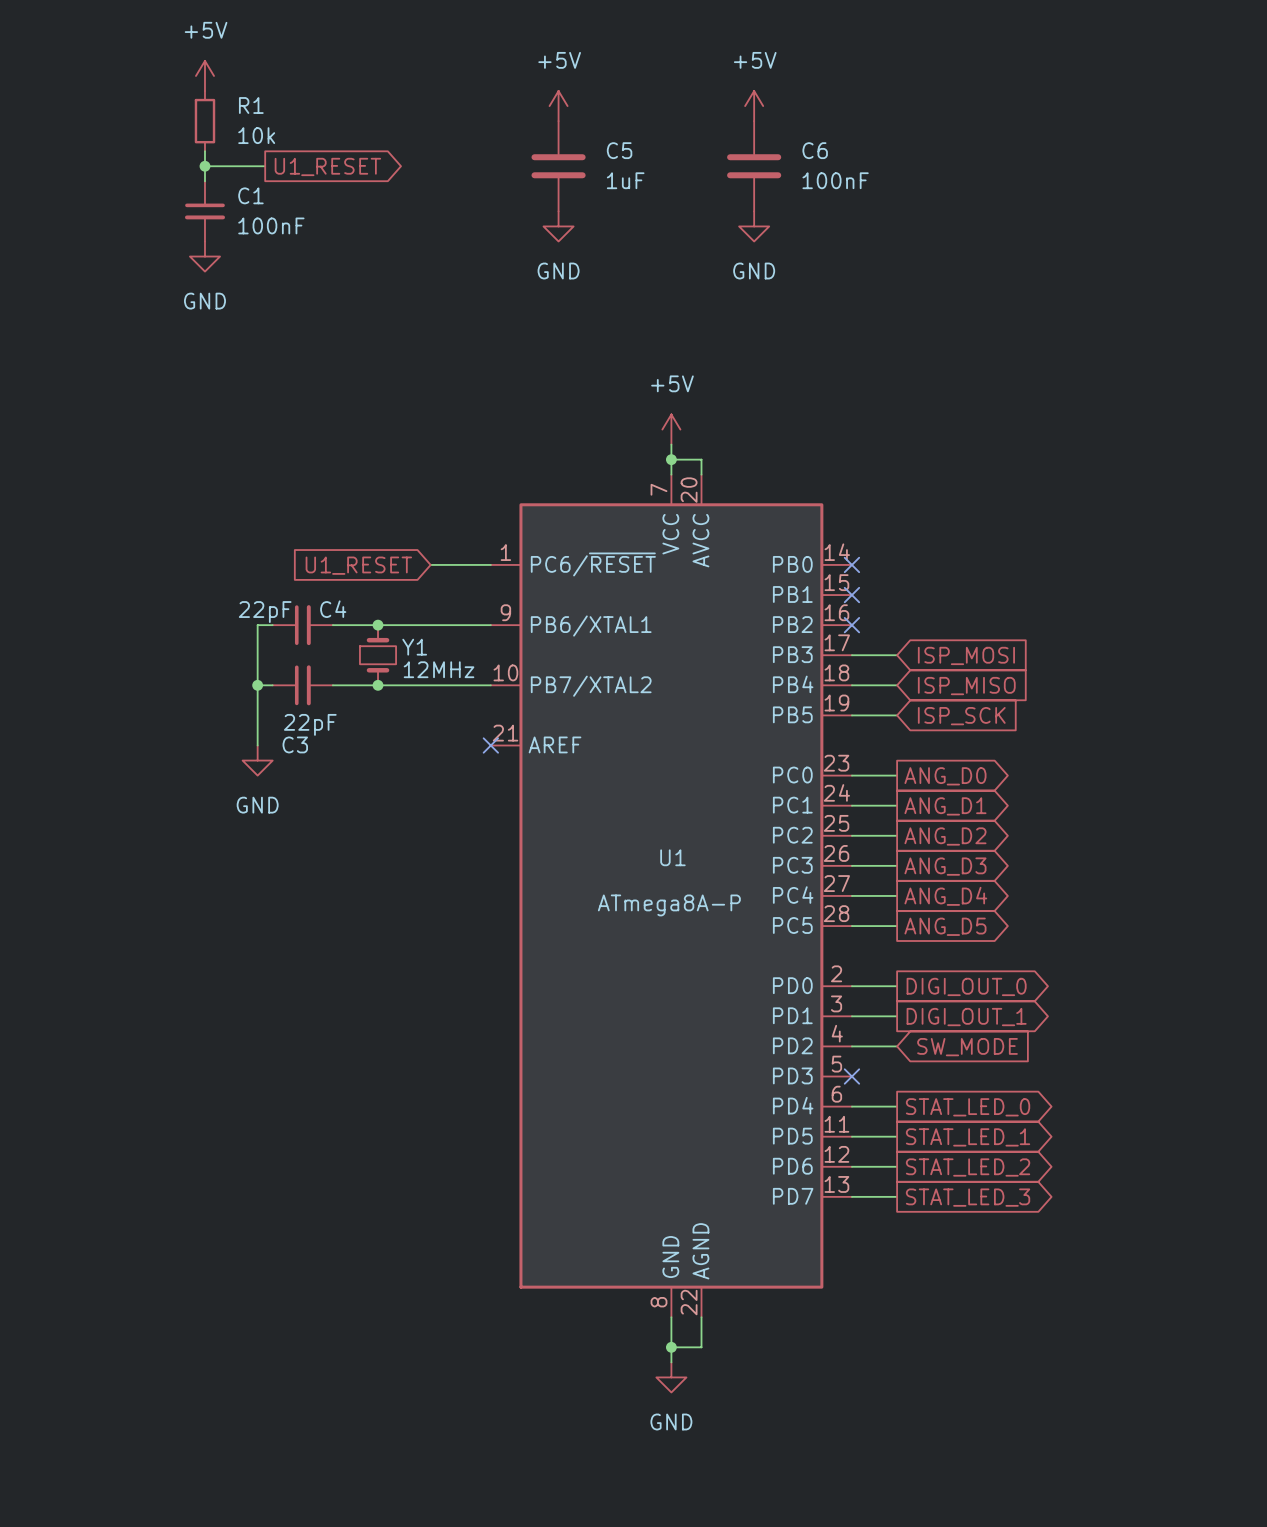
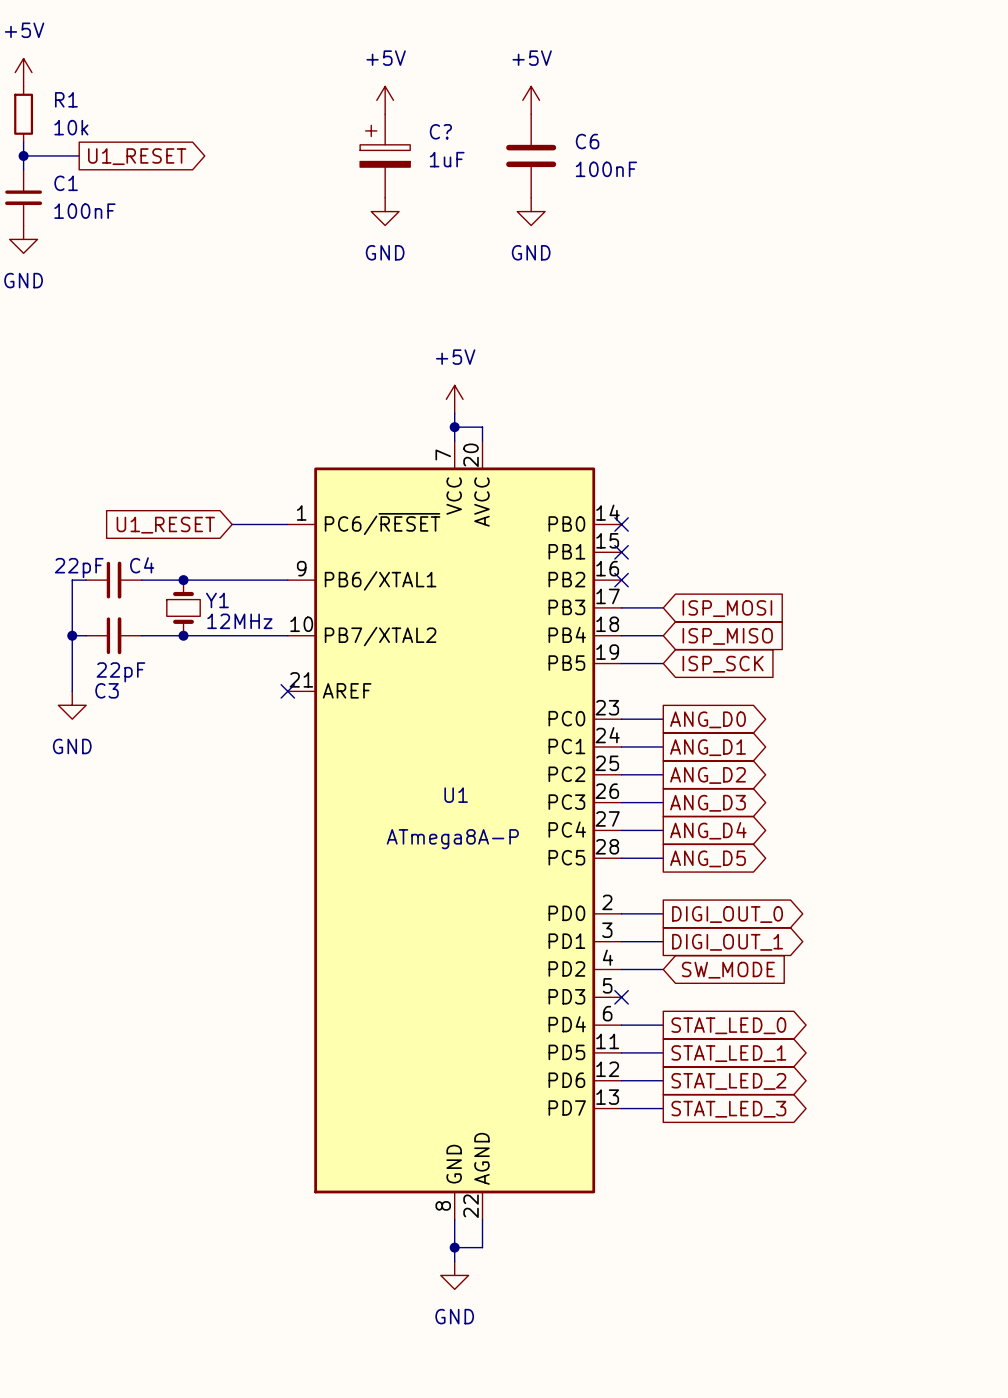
power symbol position: +5V (558, 106) -> +5V (385, 100)
C5: 1uF (558, 166) -> none
C?: none -> 1uF (385, 155)
power symbol position: GND (558, 226) -> GND (385, 211)

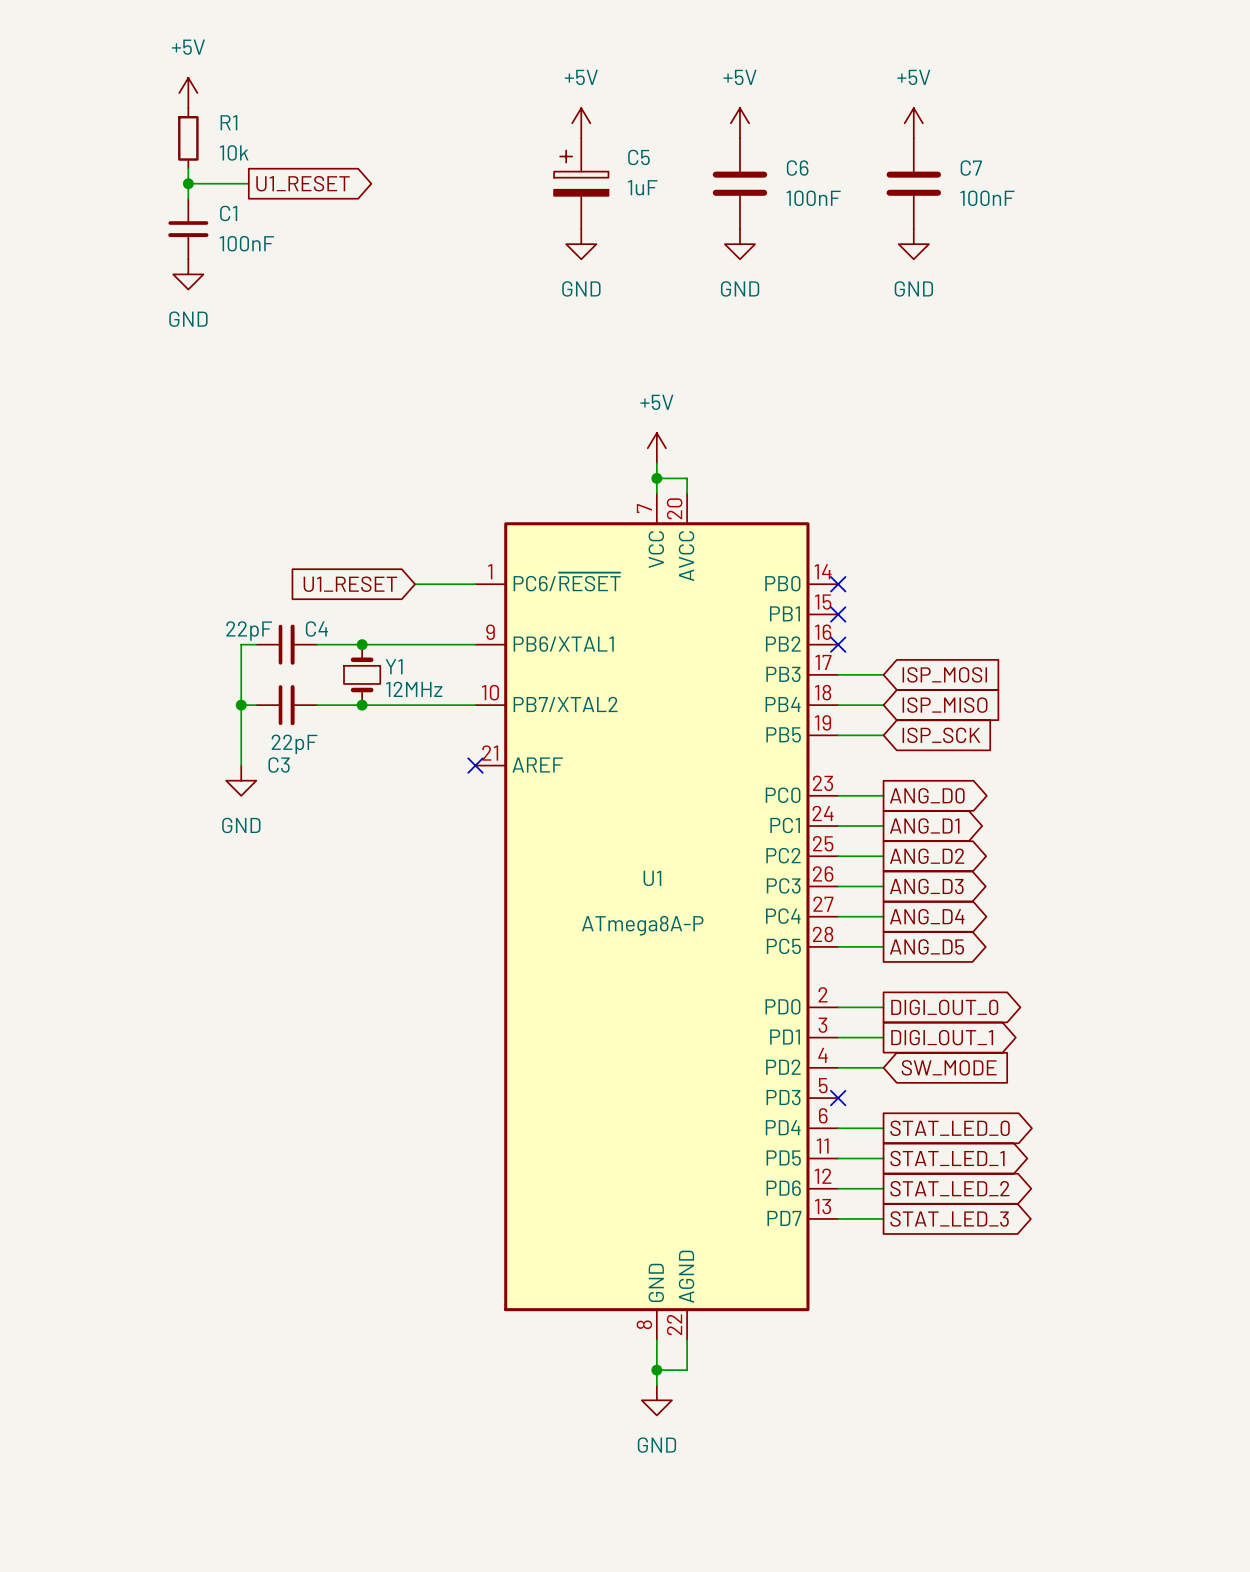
power symbol: none -> +5V (913, 123)
C? name: C? (440, 131) -> C5 (638, 157)
C7: none -> 100nF (913, 183)
power symbol: none -> GND (913, 244)

